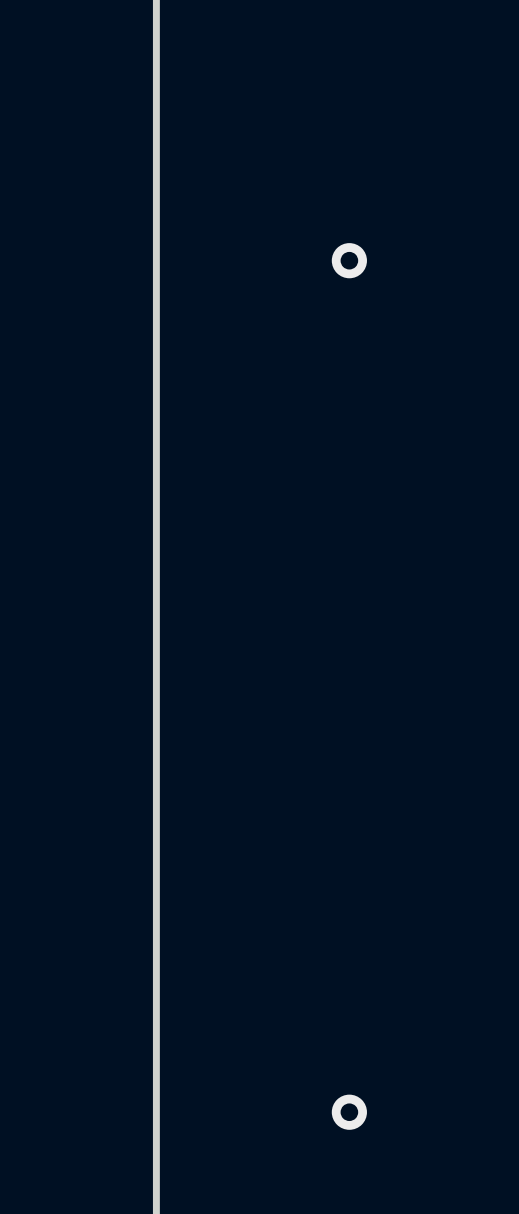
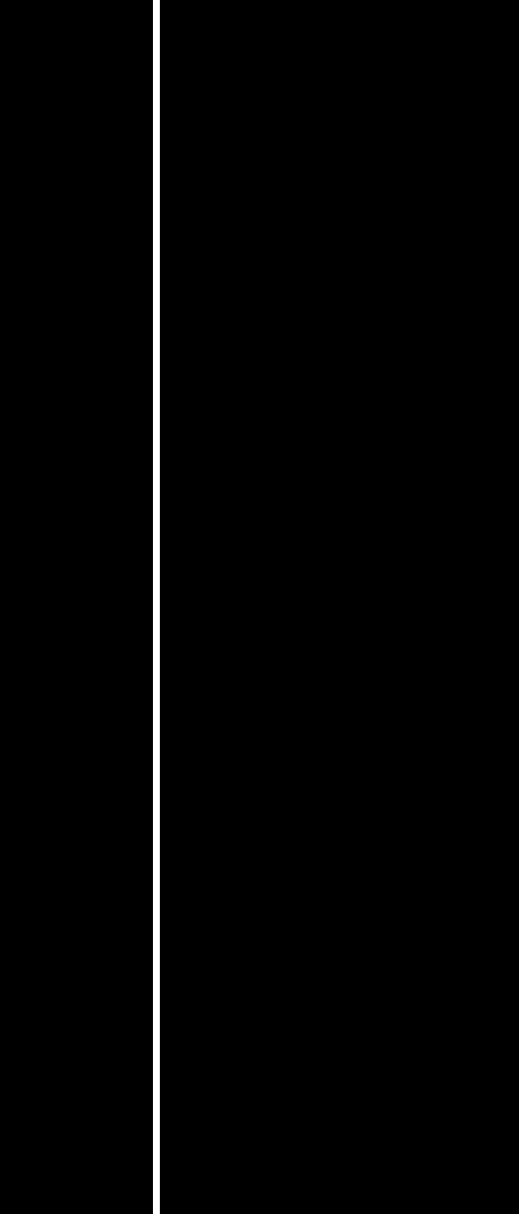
via: (349, 260) -> none
via: (349, 1112) -> none

